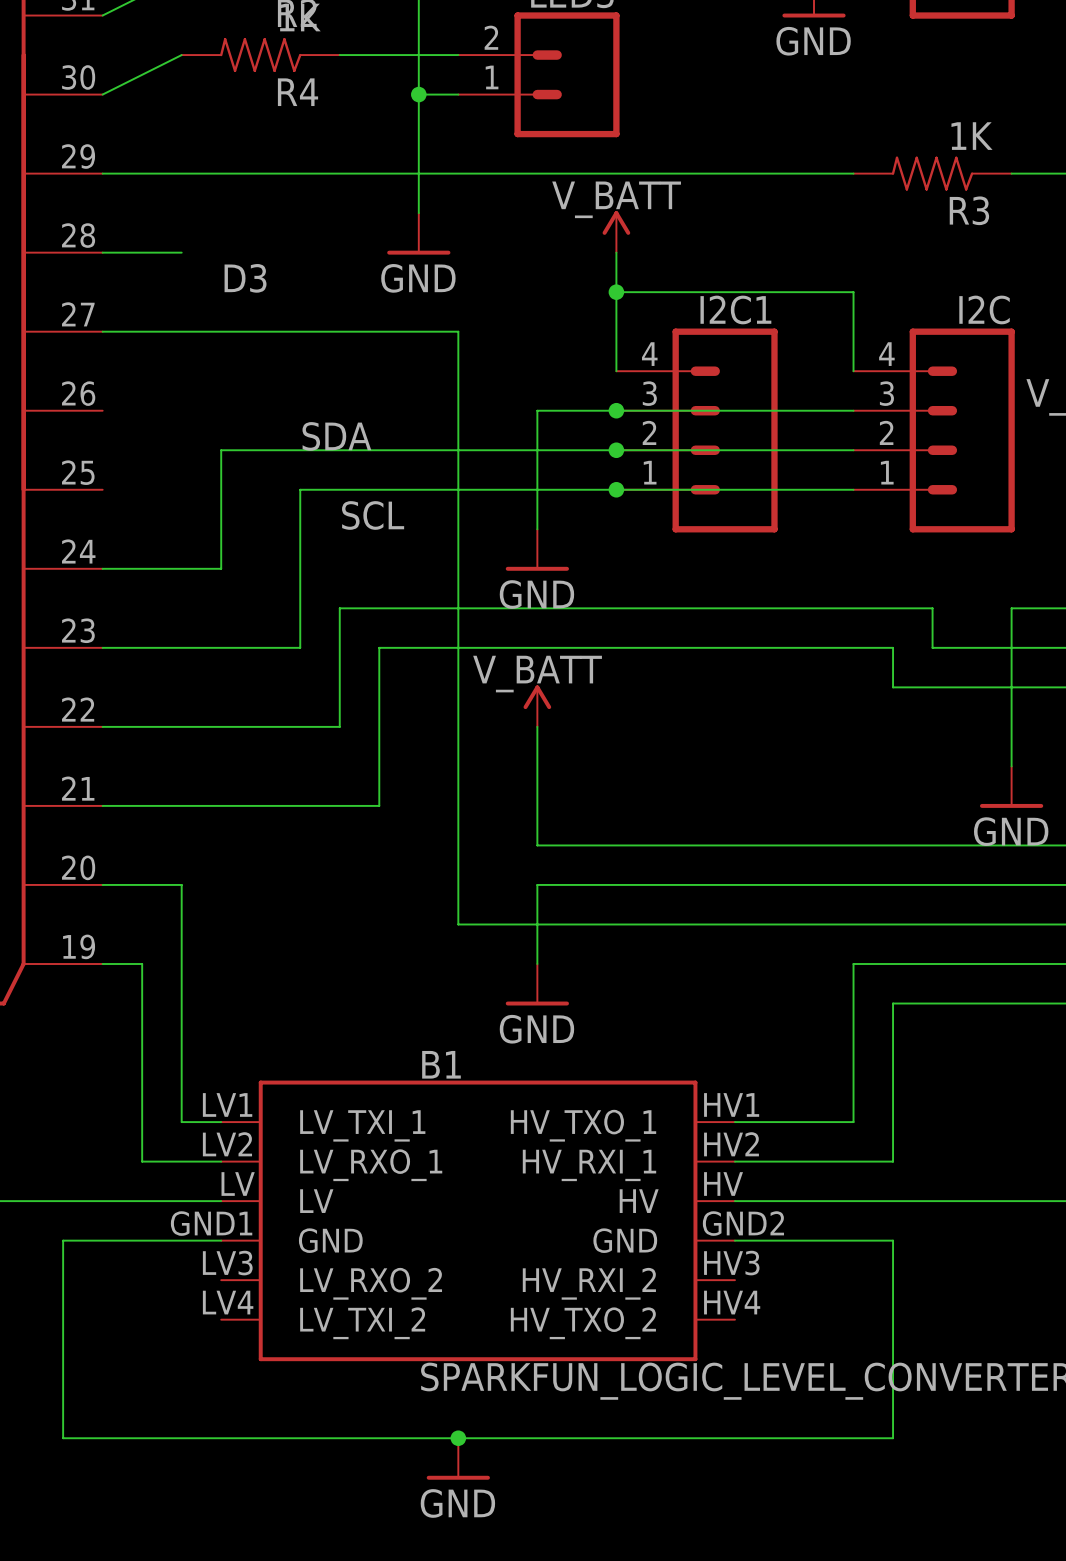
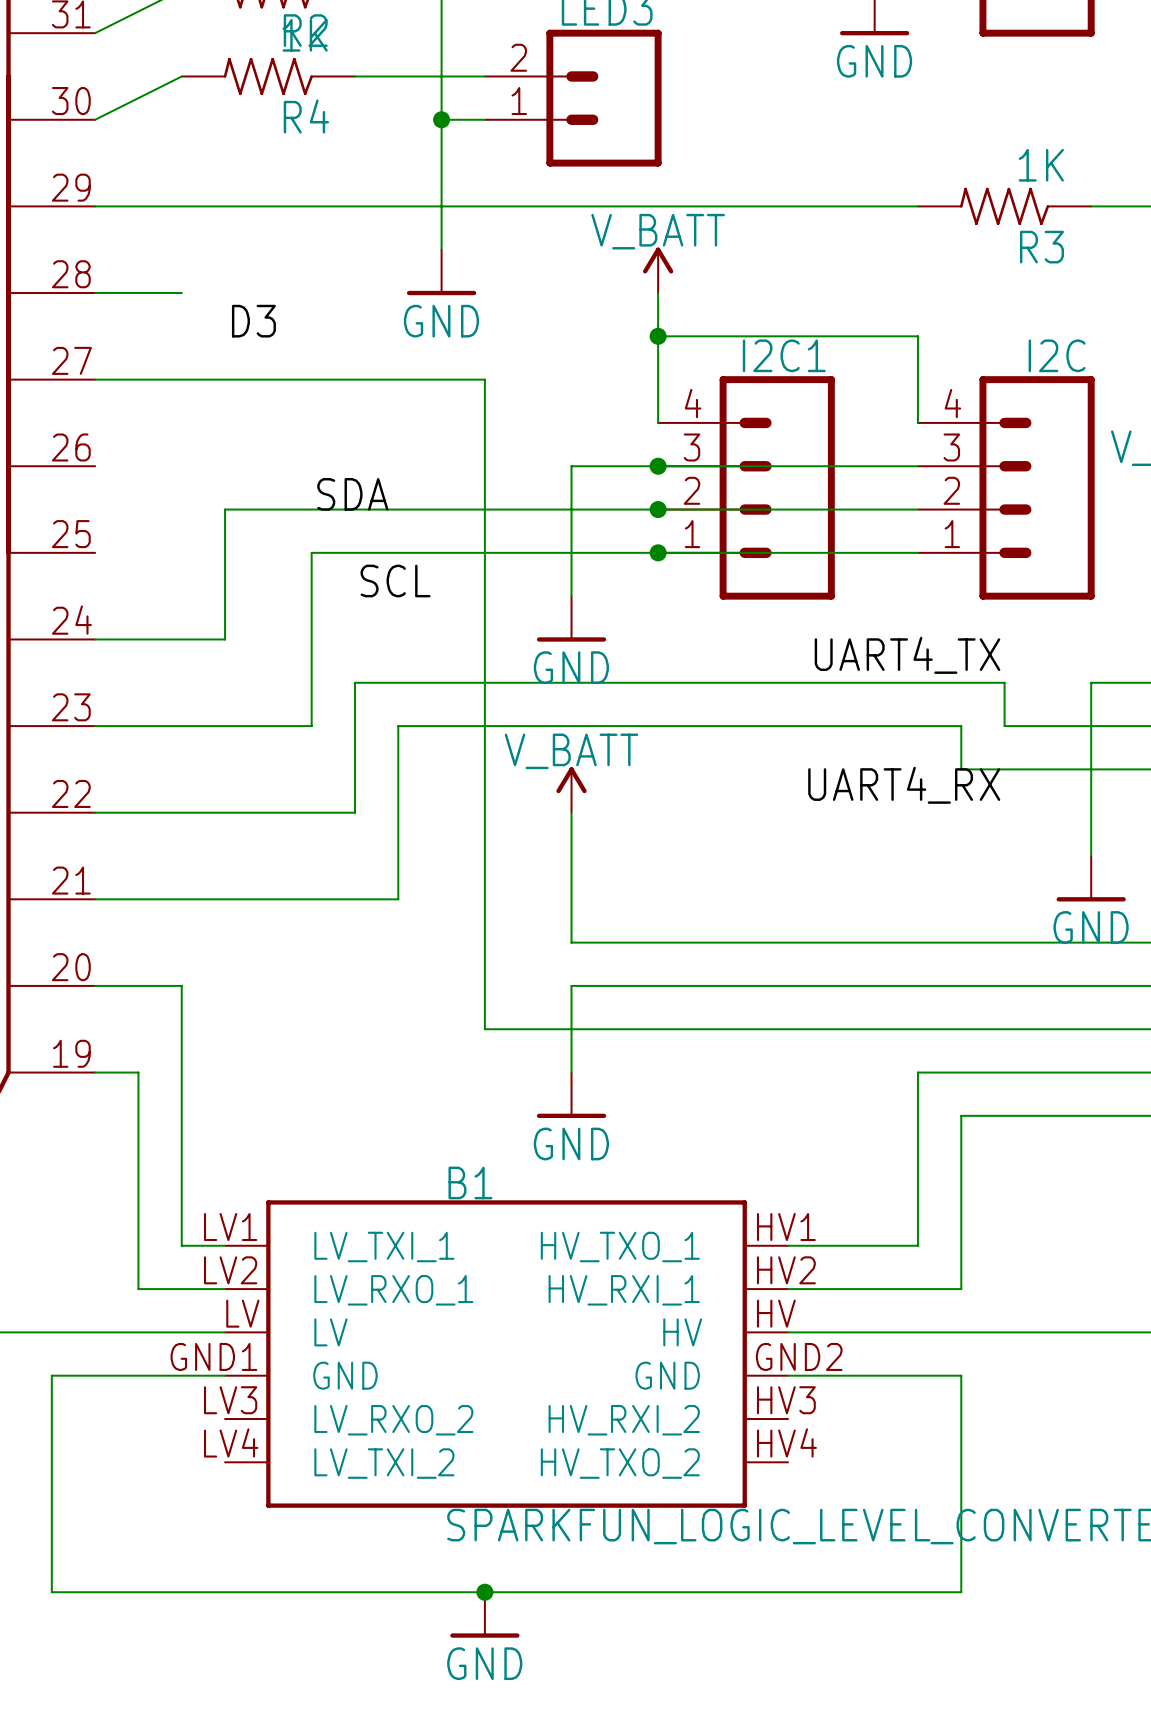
label: none -> UART4_TX (907, 655)
label: none -> UART4_RX (904, 785)

